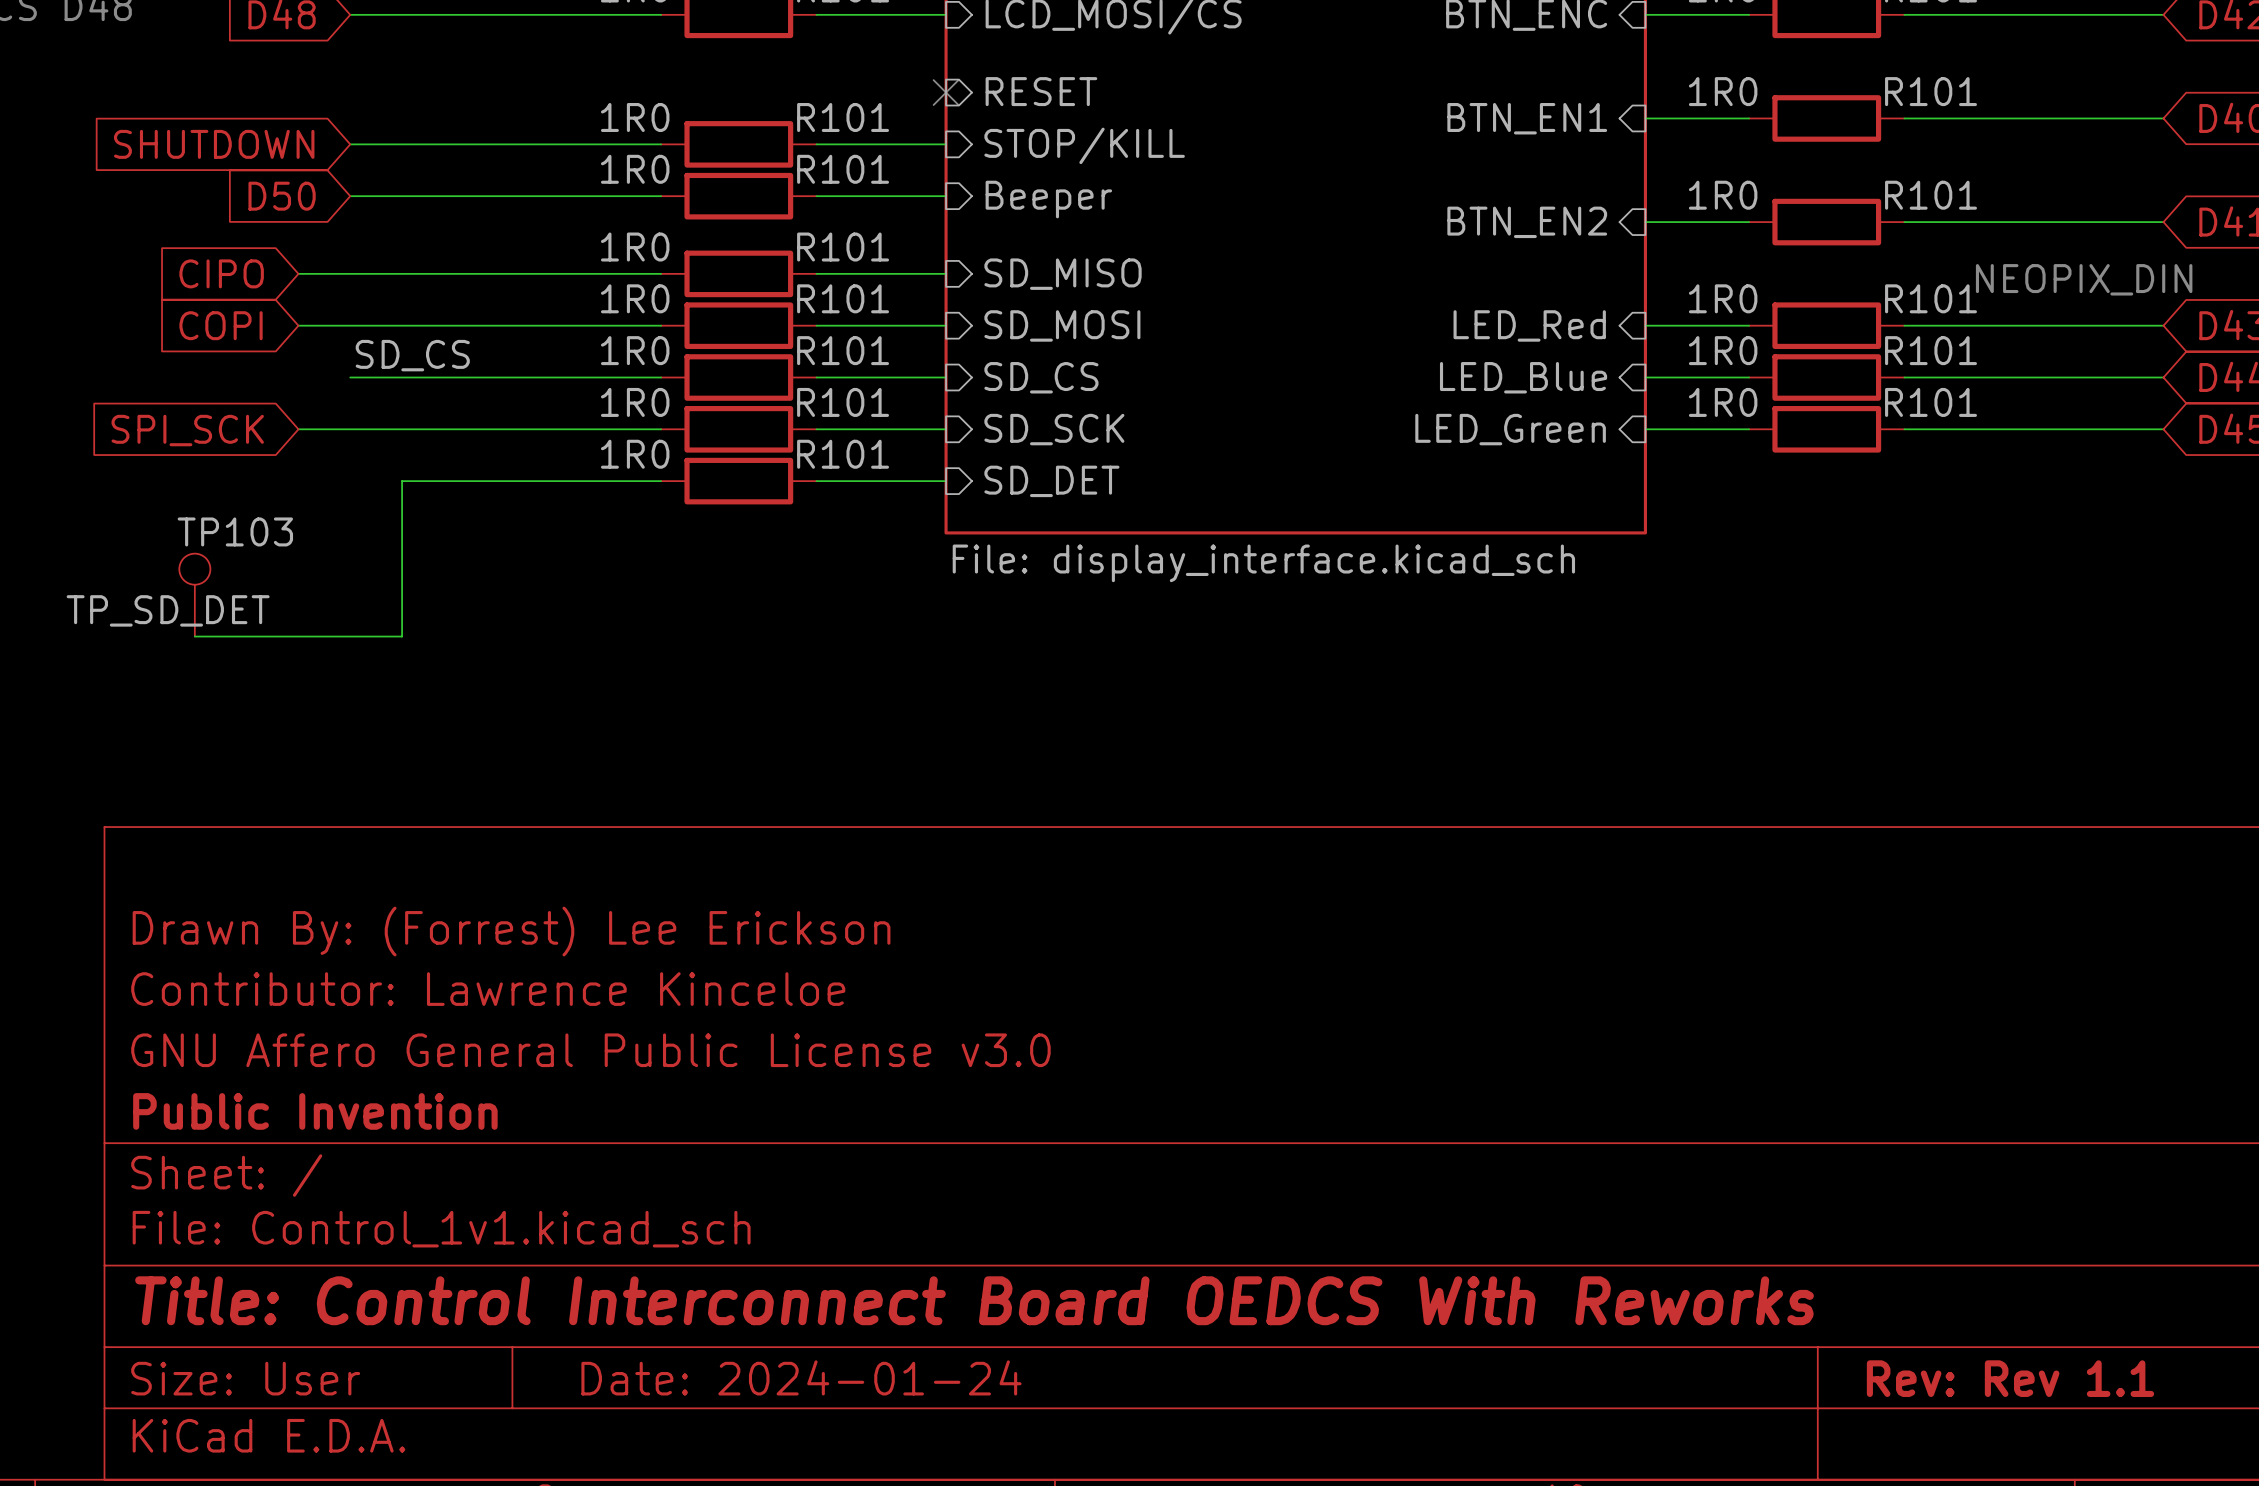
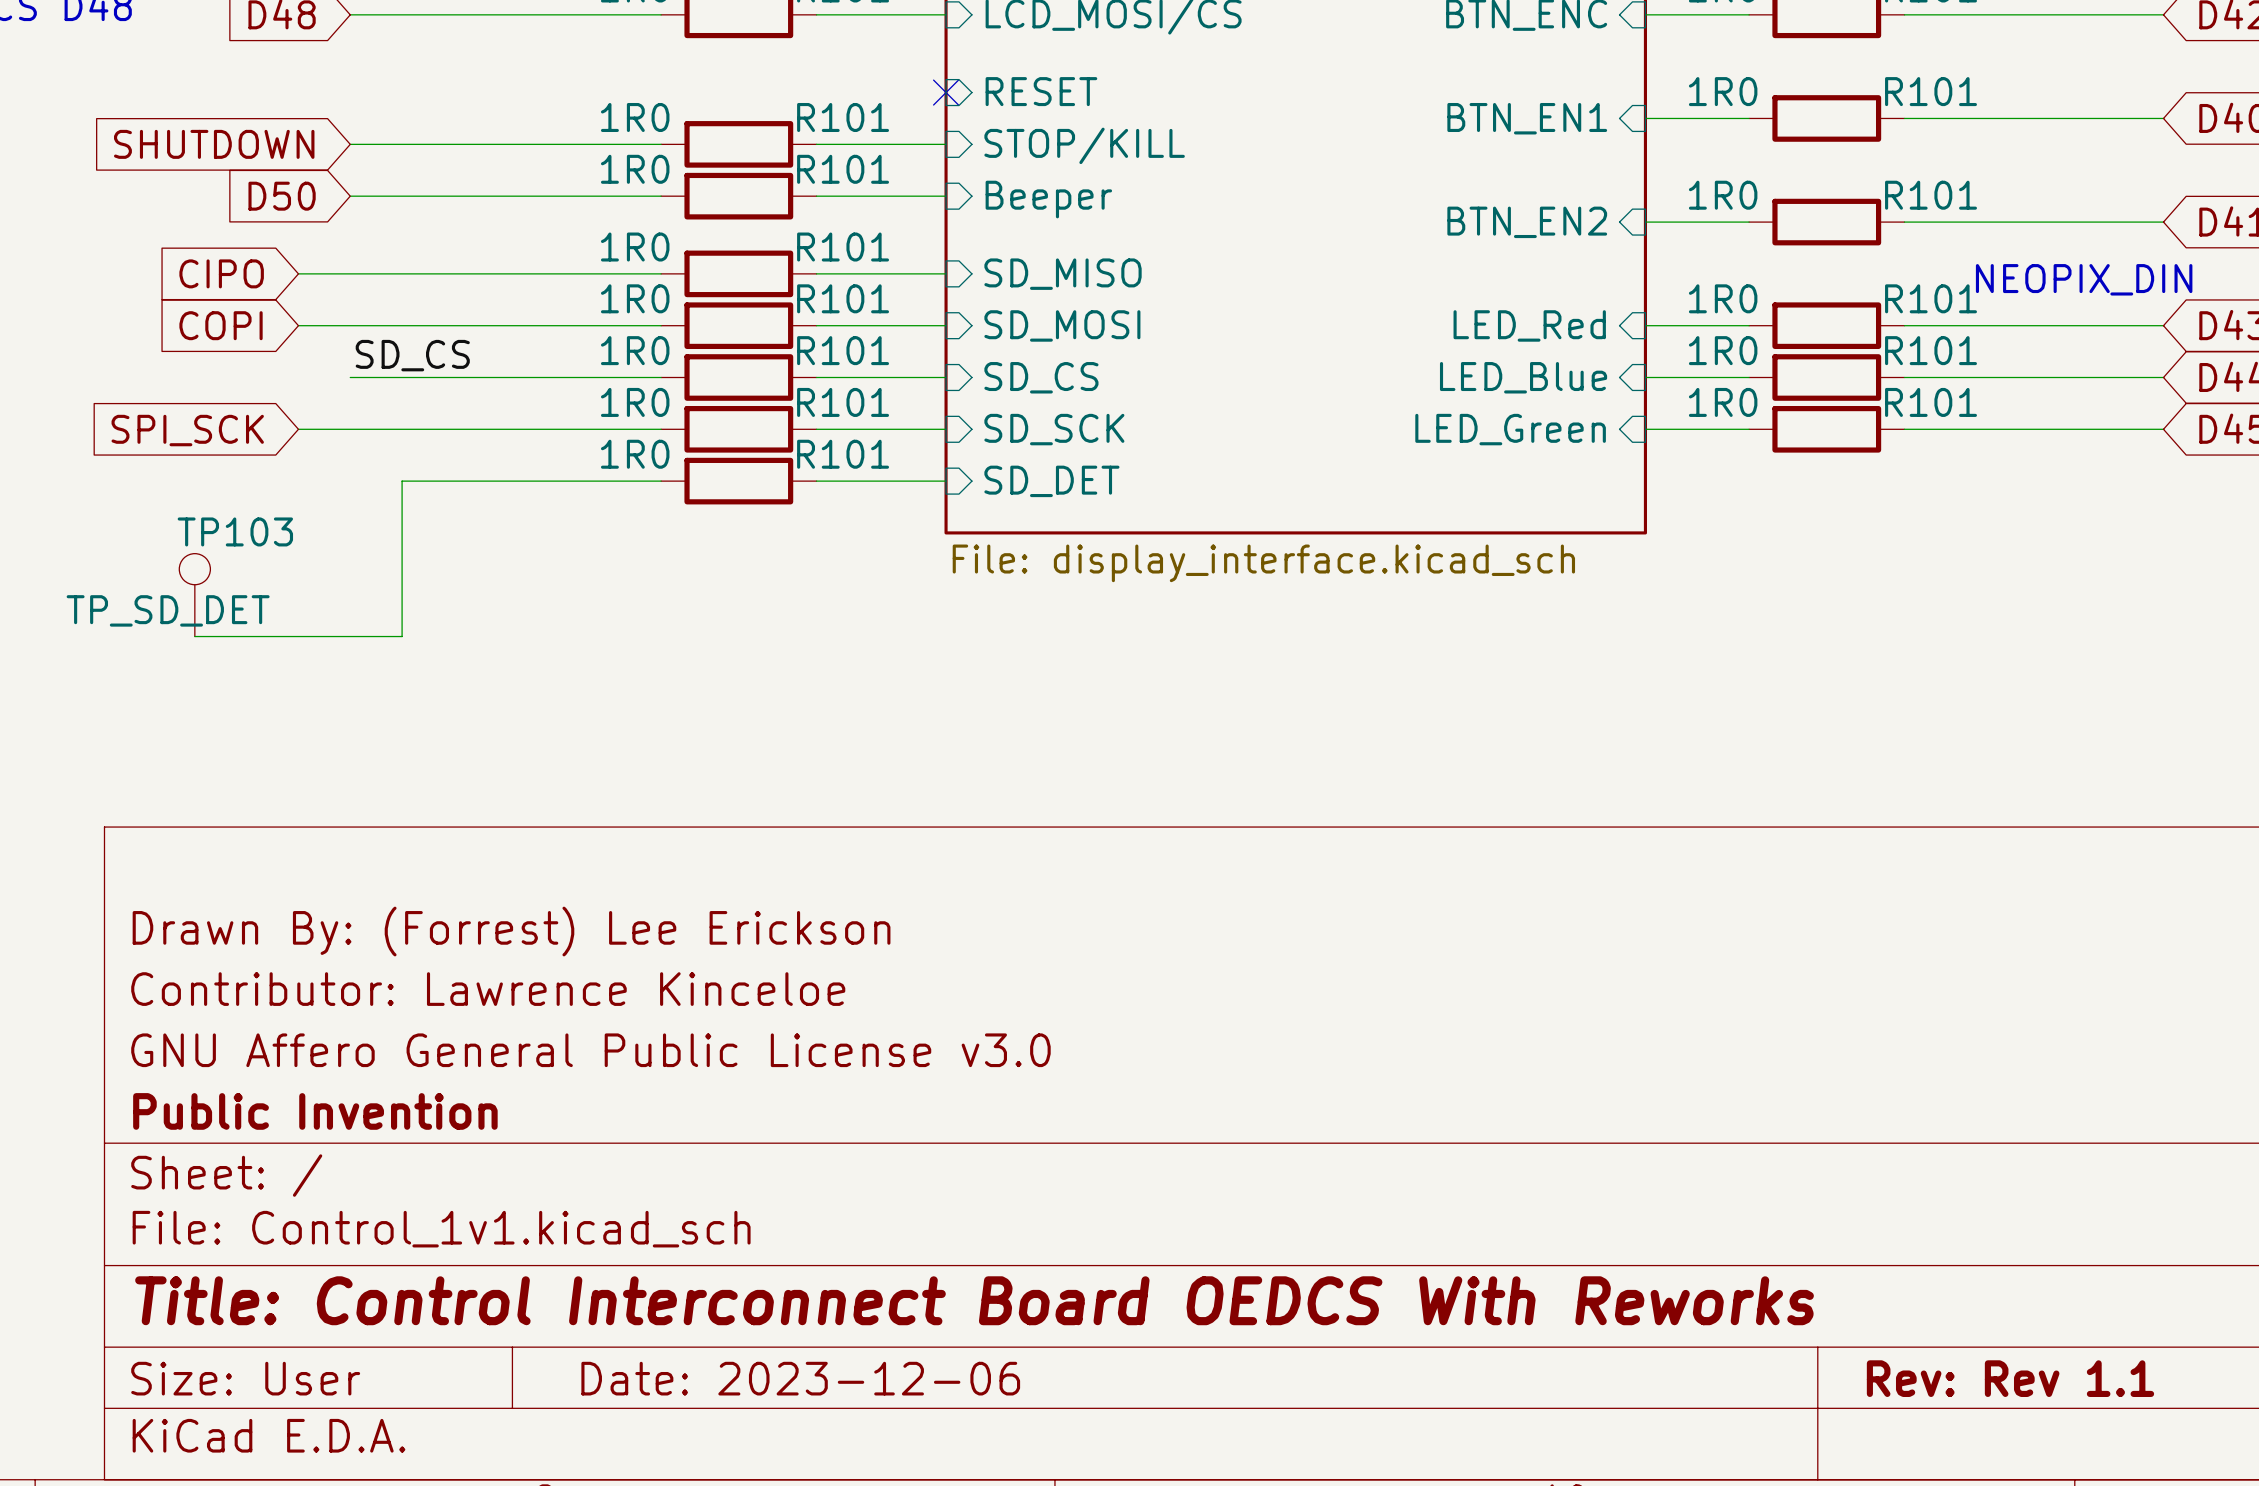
title block: Date: 2024-01-24 (801, 1377) -> Date: 2023-12-06 (800, 1378)

